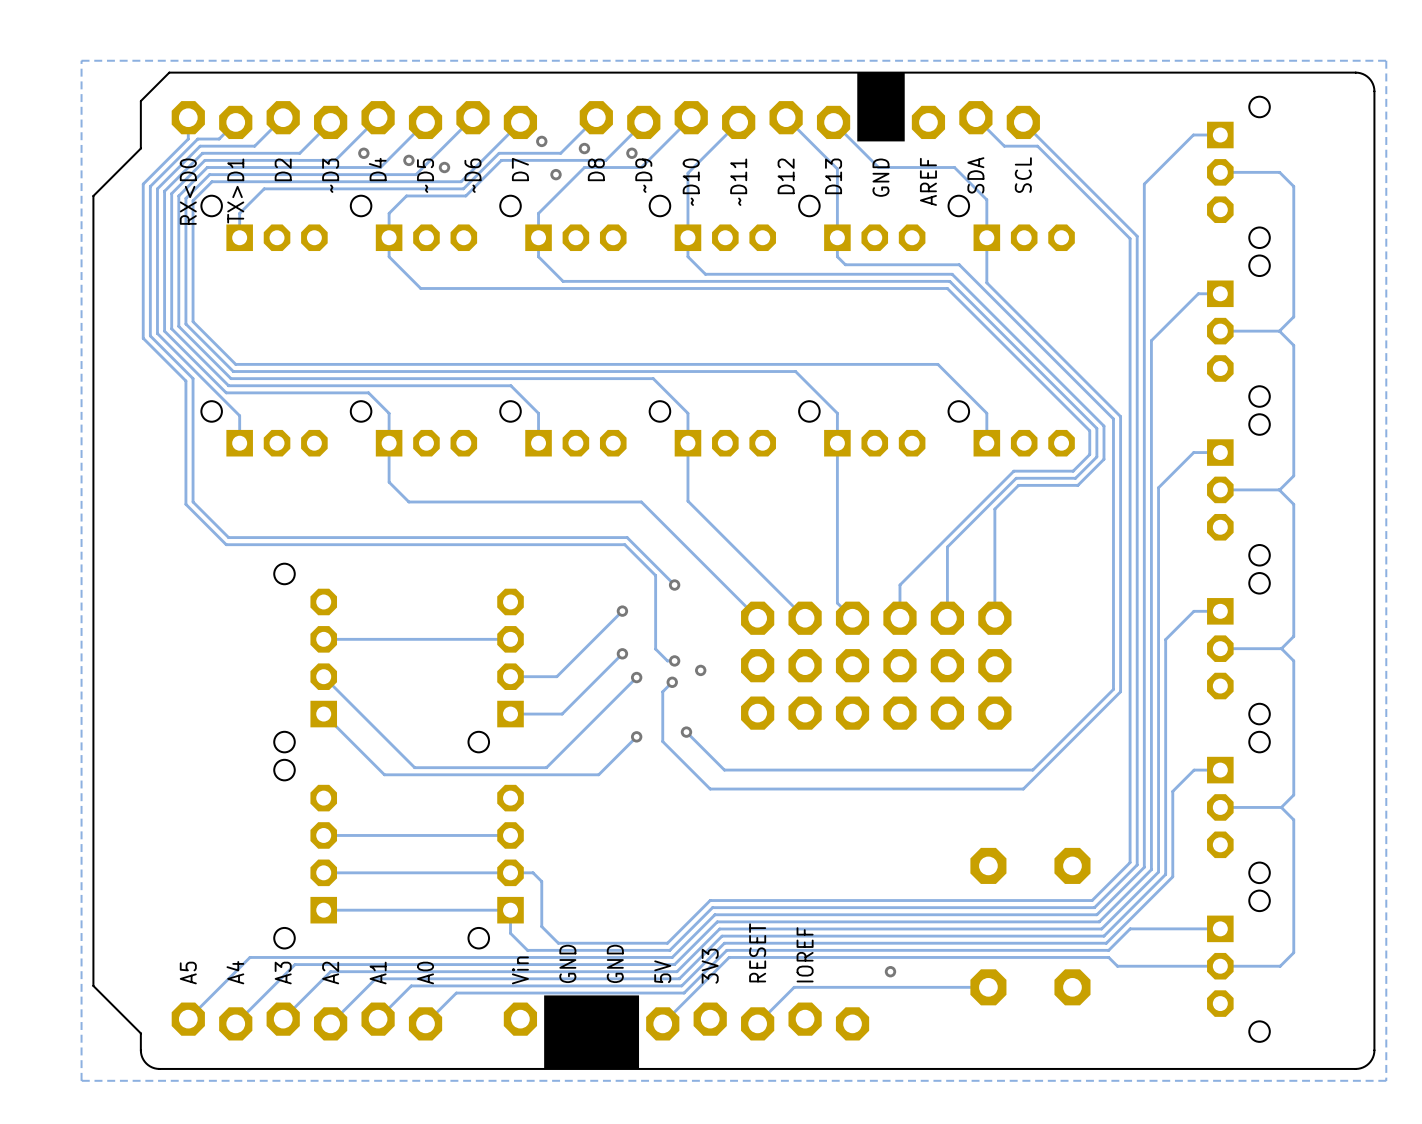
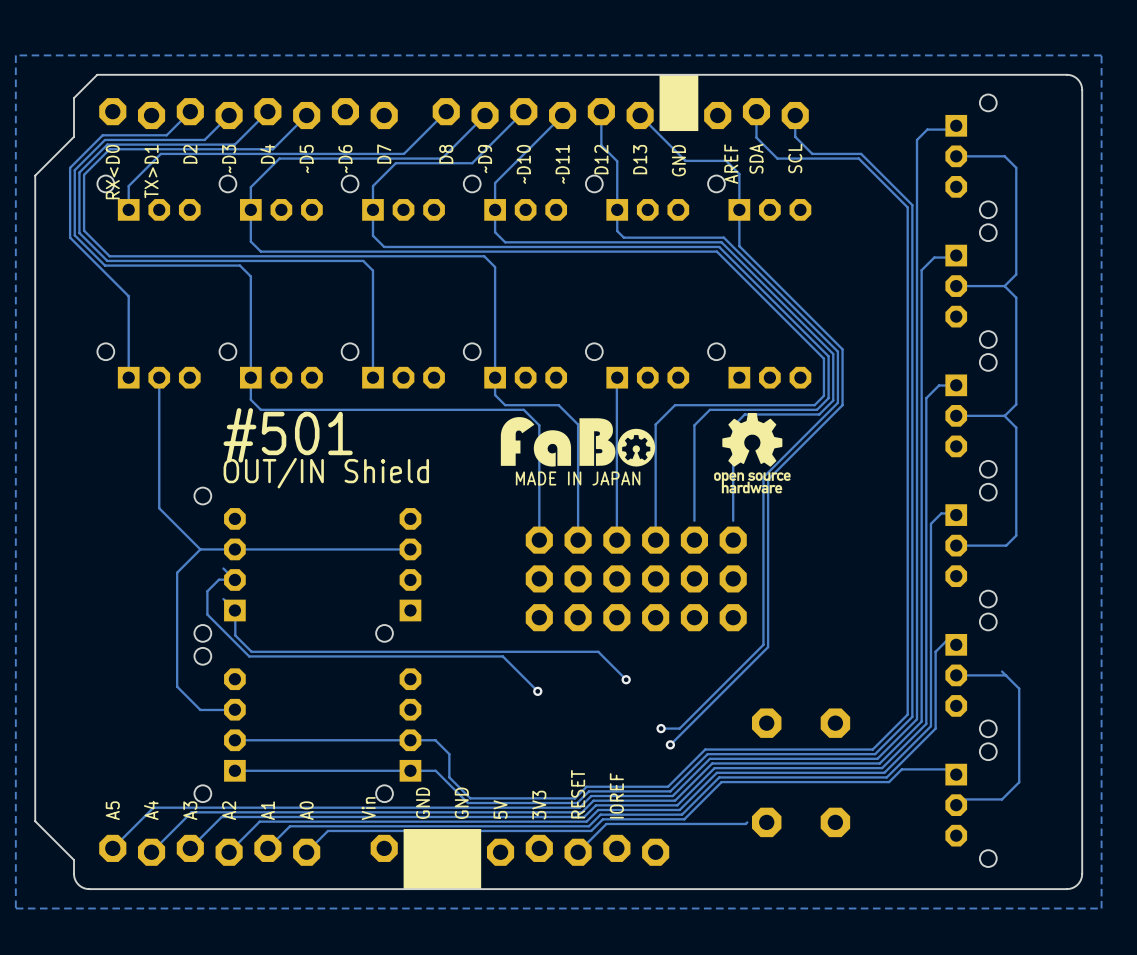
zone outline: (1386, 60) (81, 60) (81, 1080) (1386, 1080) (1386, 60) -> (1101, 55) (1101, 908) (15, 908) (15, 55) (1101, 55)
track: (188, 117) (188, 139) (143, 184) (143, 338) (185, 381) (185, 504) (226, 544) (624, 544) (655, 575) (655, 649) (667, 660) (674, 660) -> none
track: (472, 117) (416, 174) (209, 174) (185, 198) (185, 324) (233, 371) (795, 371) (837, 413) (837, 603) (852, 618) -> none
track: (786, 117) (837, 168) (837, 256) (845, 264) (959, 264) (1113, 418) (1113, 689) (1032, 770) (724, 770) (686, 732) -> (601, 111) (601, 145) (617, 161) (617, 231) (623, 237) (723, 237) (837, 351) (837, 402) (763, 477) (763, 644) (679, 728) (661, 728)
track: (975, 117) (1004, 146) (1037, 146) (1130, 238) (1130, 862) (1092, 900) (710, 900) (667, 943) (558, 943) (541, 926) (541, 881) (533, 872) (323, 872) -> (756, 111) (756, 137) (777, 158) (858, 158) (907, 207) (907, 714) (872, 749) (705, 749) (668, 786) (586, 786) (574, 798) (470, 798) (449, 777) (449, 754) (435, 740) (234, 740)
track: (235, 122) (219, 139) (197, 139) (150, 186) (150, 335) (193, 378) (193, 501) (228, 537) (627, 537) (674, 585) -> none
track: (520, 122) (461, 181) (212, 181) (193, 200) (193, 321) (235, 364) (937, 364) (986, 413) (986, 443) -> none
track: (1023, 122) (1137, 236) (1137, 864) (1094, 907) (712, 907) (669, 950) (527, 950) (510, 933) (510, 910) (323, 910) -> (795, 115) (795, 136) (812, 153) (861, 153) (912, 205) (912, 716) (875, 754) (707, 754) (670, 791) (588, 791) (577, 803) (467, 803) (435, 770) (234, 770)
track: (1220, 135) (1193, 135) (1144, 184) (1144, 867) (1096, 914) (714, 914) (672, 957) (249, 957) (238, 969) -> (958, 129) (927, 129) (917, 139) (917, 719) (877, 758) (709, 758) (672, 796) (591, 796) (579, 807) (153, 807)
via: (541, 141) -> none
track: (254, 146) (200, 146) (157, 188) (157, 333) (239, 415) (239, 443) -> (167, 134) (102, 135) (70, 167) (70, 237) (128, 296) (128, 377)
via: (584, 148) -> none
track: (300, 152) (202, 153) (164, 191) (164, 331) (226, 392) (368, 392) (389, 413) (389, 482) (408, 501) (641, 501) (757, 618) -> (204, 139) (105, 139) (74, 170) (74, 235) (105, 265) (239, 265) (250, 276) (250, 399) (260, 409) (523, 409) (539, 425) (539, 540)
via: (363, 153) -> none
track: (560, 153) (499, 153) (463, 188) (264, 188) (239, 213) (239, 237) -> (417, 140) (403, 153) (160, 153) (128, 186) (128, 209)
via: (631, 153) -> none
track: (337, 158) (335, 160) (204, 160) (171, 193) (171, 328) (228, 385) (510, 385) (538, 413) (538, 443) -> (234, 144) (107, 144) (79, 172) (79, 233) (107, 260) (363, 260) (372, 270) (372, 377)
via: (408, 160) -> none
track: (605, 160) (501, 160) (465, 195) (406, 195) (389, 213) (389, 256) (420, 288) (947, 288) (1089, 430) (1089, 454) (1073, 471) (1013, 471) (899, 585) -> (483, 152) (472, 163) (395, 163) (372, 186) (372, 235) (384, 246) (719, 246) (828, 356) (828, 398) (816, 409) (709, 409) (694, 425) (694, 493)
track: none -> (454, 146) (441, 158) (279, 158) (250, 187) (250, 241) (260, 251) (716, 251) (823, 358) (823, 395) (814, 405) (675, 405) (655, 424) (655, 540)
track: (384, 163) (380, 167) (207, 167) (178, 195) (178, 326) (231, 378) (653, 378) (687, 413) (687, 501) (805, 618) -> (272, 149) (109, 149) (84, 174) (84, 230) (109, 256) (484, 256) (495, 267) (495, 395) (505, 405) (558, 405) (578, 424) (578, 540)
via: (444, 167) -> none
track: (641, 167) (584, 167) (538, 213) (538, 256) (563, 281) (949, 281) (1096, 428) (1096, 456) (1075, 478) (1016, 478) (947, 547) -> (521, 156) (495, 183) (495, 232) (505, 242) (721, 242) (833, 354) (833, 400) (819, 414) (744, 414) (733, 426) (733, 462)
track: (878, 167) (954, 167) (986, 199) (986, 282) (1120, 416) (1120, 691) (1023, 789) (710, 789) (662, 741) (662, 691) (672, 682) -> (676, 152) (685, 160) (726, 160) (739, 174) (739, 246) (842, 349) (842, 405) (768, 479) (768, 647) (670, 744)
track: (687, 173) (687, 256) (705, 274) (952, 274) (1103, 426) (1103, 459) (1077, 485) (1018, 485) (994, 509) (994, 618) -> none
via: (556, 174) -> none
text position: AREF (928, 181) -> AREF (731, 164)
part position: (264, 223) -> (149, 198)
part position: (413, 223) -> (271, 198)
part position: (563, 223) -> (393, 198)
part position: (712, 223) -> (515, 198)
part position: (862, 223) -> (637, 198)
part position: (1011, 223) -> (759, 198)
track: (1220, 293) (1198, 293) (1151, 340) (1151, 869) (1099, 921) (717, 921) (674, 964) (295, 964) (284, 975) -> (958, 257) (934, 257) (921, 270) (921, 721) (879, 763) (712, 763) (675, 800) (593, 800) (581, 812) (191, 812)
part position: (264, 428) -> (149, 365)
part position: (413, 428) -> (271, 365)
part position: (563, 428) -> (393, 365)
part position: (712, 428) -> (515, 365)
part position: (862, 428) -> (637, 365)
part position: (1011, 428) -> (759, 365)
track: none -> (159, 377) (159, 508) (200, 549)
track: none -> (617, 377) (616, 540)
track: (1220, 452) (1193, 452) (1158, 487) (1158, 872) (1101, 929) (719, 929) (676, 971) (330, 971) (321, 980) -> (958, 385) (939, 385) (926, 398) (926, 723) (882, 768) (714, 768) (677, 805) (595, 805) (584, 816) (221, 816)
drawing: none -> [714, 412, 791, 494]
drawing: none -> [500, 417, 656, 467]
text: none -> #501 (288, 435)
text: none -> OUT/IN Shield (326, 473)
text: none -> MADE IN JAPAN (578, 478)
via: (674, 585) -> none
track: (622, 611) (556, 676) (510, 676) -> none
via: (622, 611) -> none
track: (1220, 611) (1193, 611) (1165, 639) (1165, 874) (1103, 936) (722, 936) (679, 978) (375, 978) (368, 986) -> (958, 513) (941, 513) (930, 523) (930, 726) (884, 772) (716, 772) (679, 810) (598, 810) (586, 821) (259, 821)
track: (510, 639) (323, 639) -> none
track: (1281, 648) (1293, 660) (1293, 795) (1281, 807) (1293, 819) (1293, 952) (1280, 966) (1117, 966) (1108, 957) (729, 957) (662, 1023) -> none
track: none -> (200, 549) (177, 572) (177, 686) (200, 709) (234, 709)
track: none -> (410, 549) (200, 549)
track: (622, 653) (562, 714) (510, 714) -> none
via: (622, 653) -> none
part position: (305, 658) -> (220, 564)
via: (674, 660) -> none
part position: (757, 665) -> (578, 578)
part position: (805, 665) -> (616, 578)
part position: (852, 665) -> (655, 578)
part position: (899, 665) -> (694, 578)
part position: (947, 665) -> (733, 578)
part: (994, 665) -> none
part position: (496, 670) -> (398, 574)
via: (700, 670) -> none
track: (636, 677) (546, 767) (414, 767) (337, 690) -> (537, 691) (502, 656) (249, 656) (207, 614) (207, 591) (219, 579) (234, 579)
via: (636, 677) -> none
via: (672, 682) -> none
part: none -> (539, 578)
track: (338, 728) (384, 774) (598, 774) (636, 736) -> (235, 610) (235, 635) (251, 651) (598, 651) (626, 679)
via: (686, 732) -> none
via: (636, 736) -> none
track: (1220, 770) (1194, 770) (1172, 791) (1172, 876) (1106, 943) (724, 943) (681, 985) (411, 985) (405, 992) -> (958, 641) (945, 641) (935, 651) (935, 728) (886, 777) (719, 777) (682, 814) (600, 814) (588, 826) (289, 826)
track: none -> (1002, 671) (1019, 688) (1019, 782) (1002, 799) (958, 799)
via: none -> (626, 679)
via: none -> (537, 691)
track: (510, 835) (323, 835) -> none
part position: (305, 854) -> (220, 725)
part position: (496, 866) -> (398, 735)
via: none -> (661, 728)
via: none -> (670, 744)
track: (1220, 928) (1130, 928) (1108, 950) (726, 950) (684, 993) (456, 993) (451, 997) -> (958, 769) (901, 769) (889, 782) (721, 782) (684, 819) (602, 819) (591, 830) (327, 830)
text position: Vin (520, 970) -> Vin (368, 808)
via: (890, 971) -> none
track: (988, 987) (794, 987) (792, 989) -> (747, 822) (745, 823) (606, 823)

